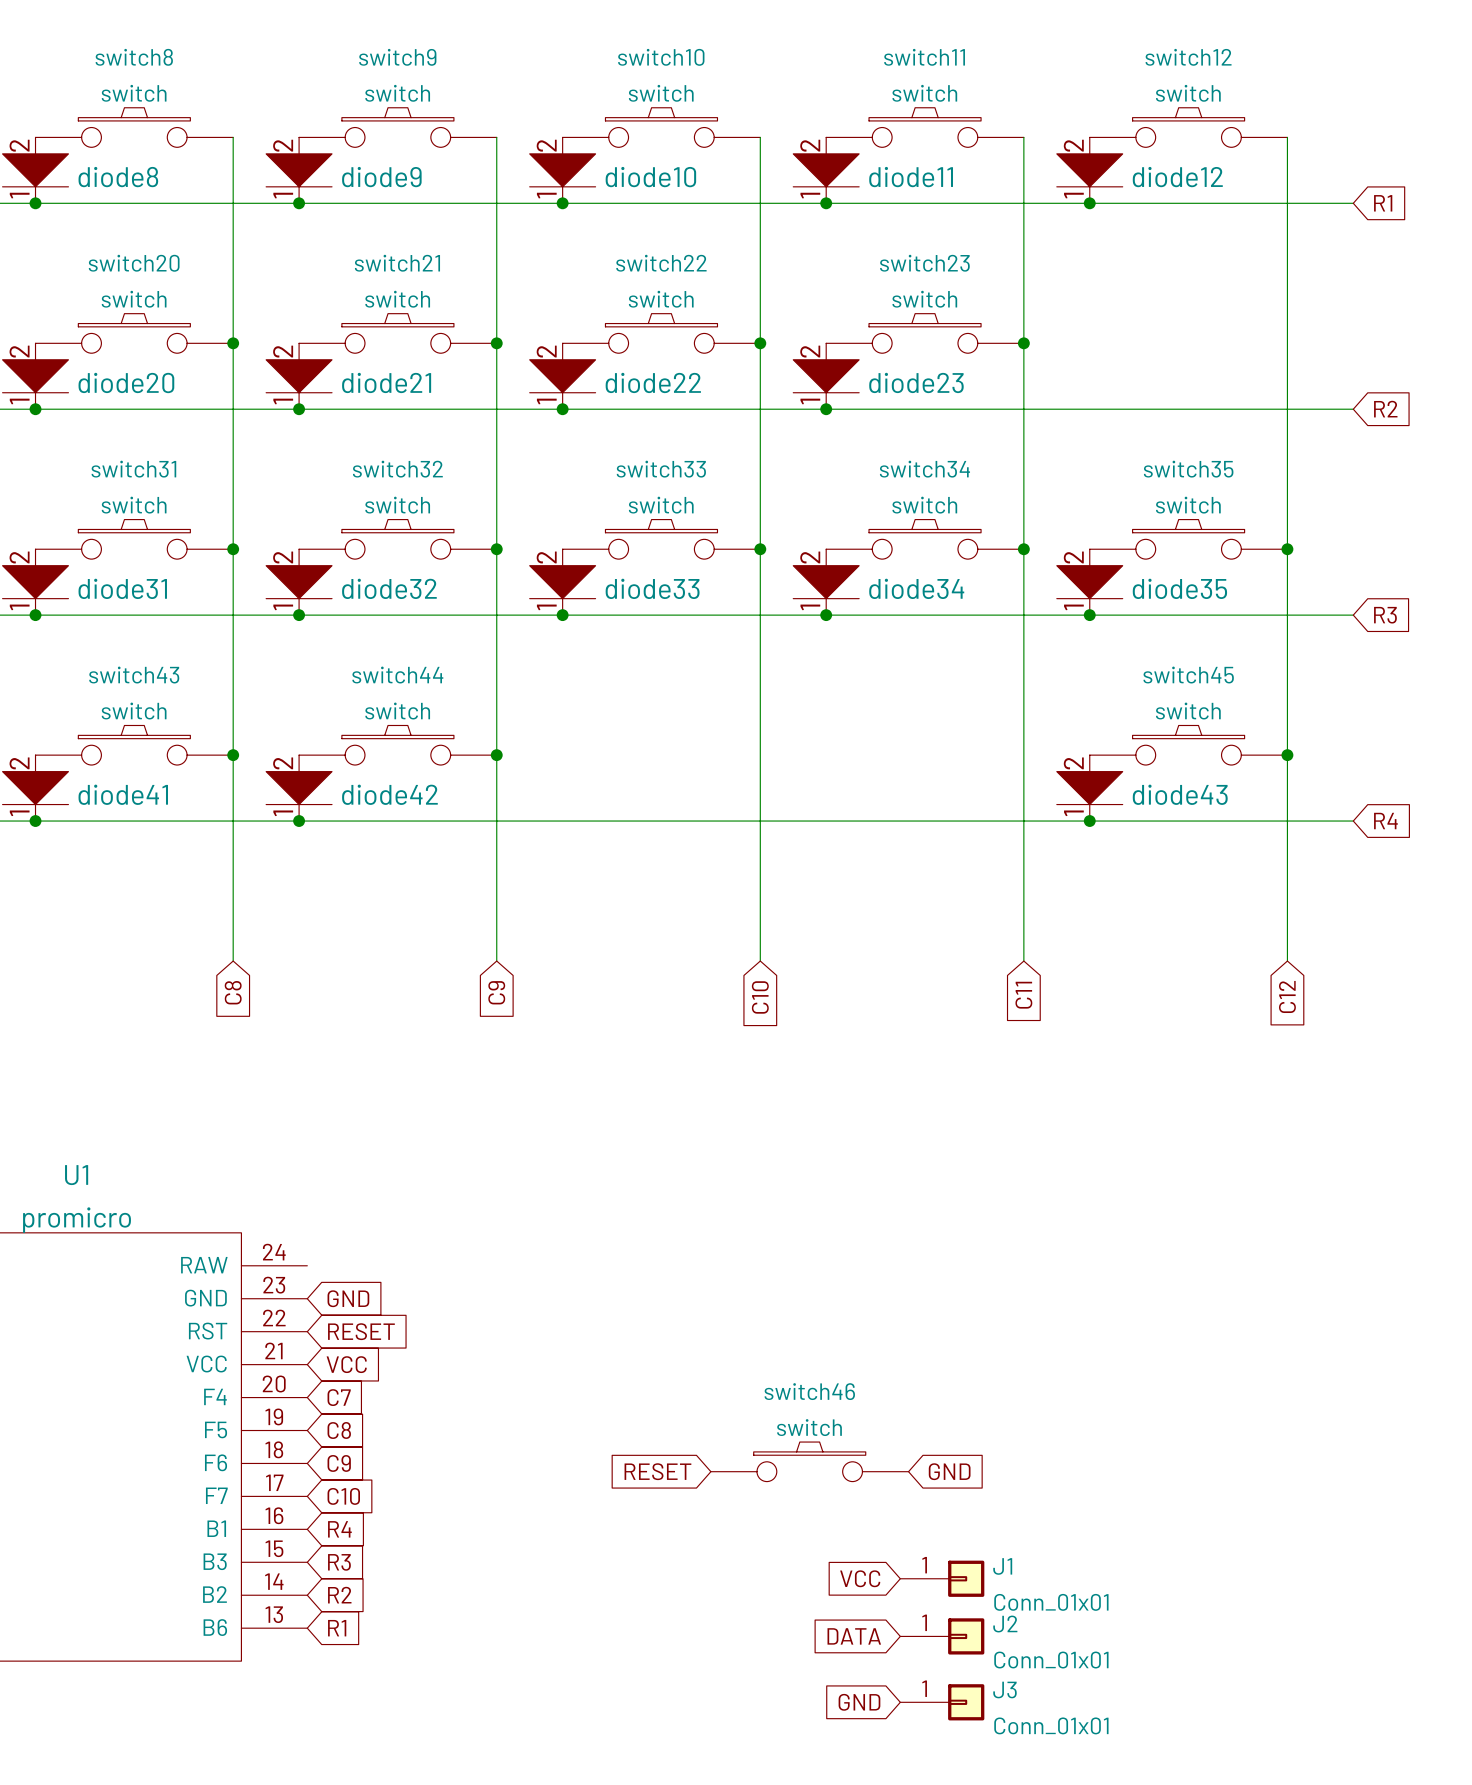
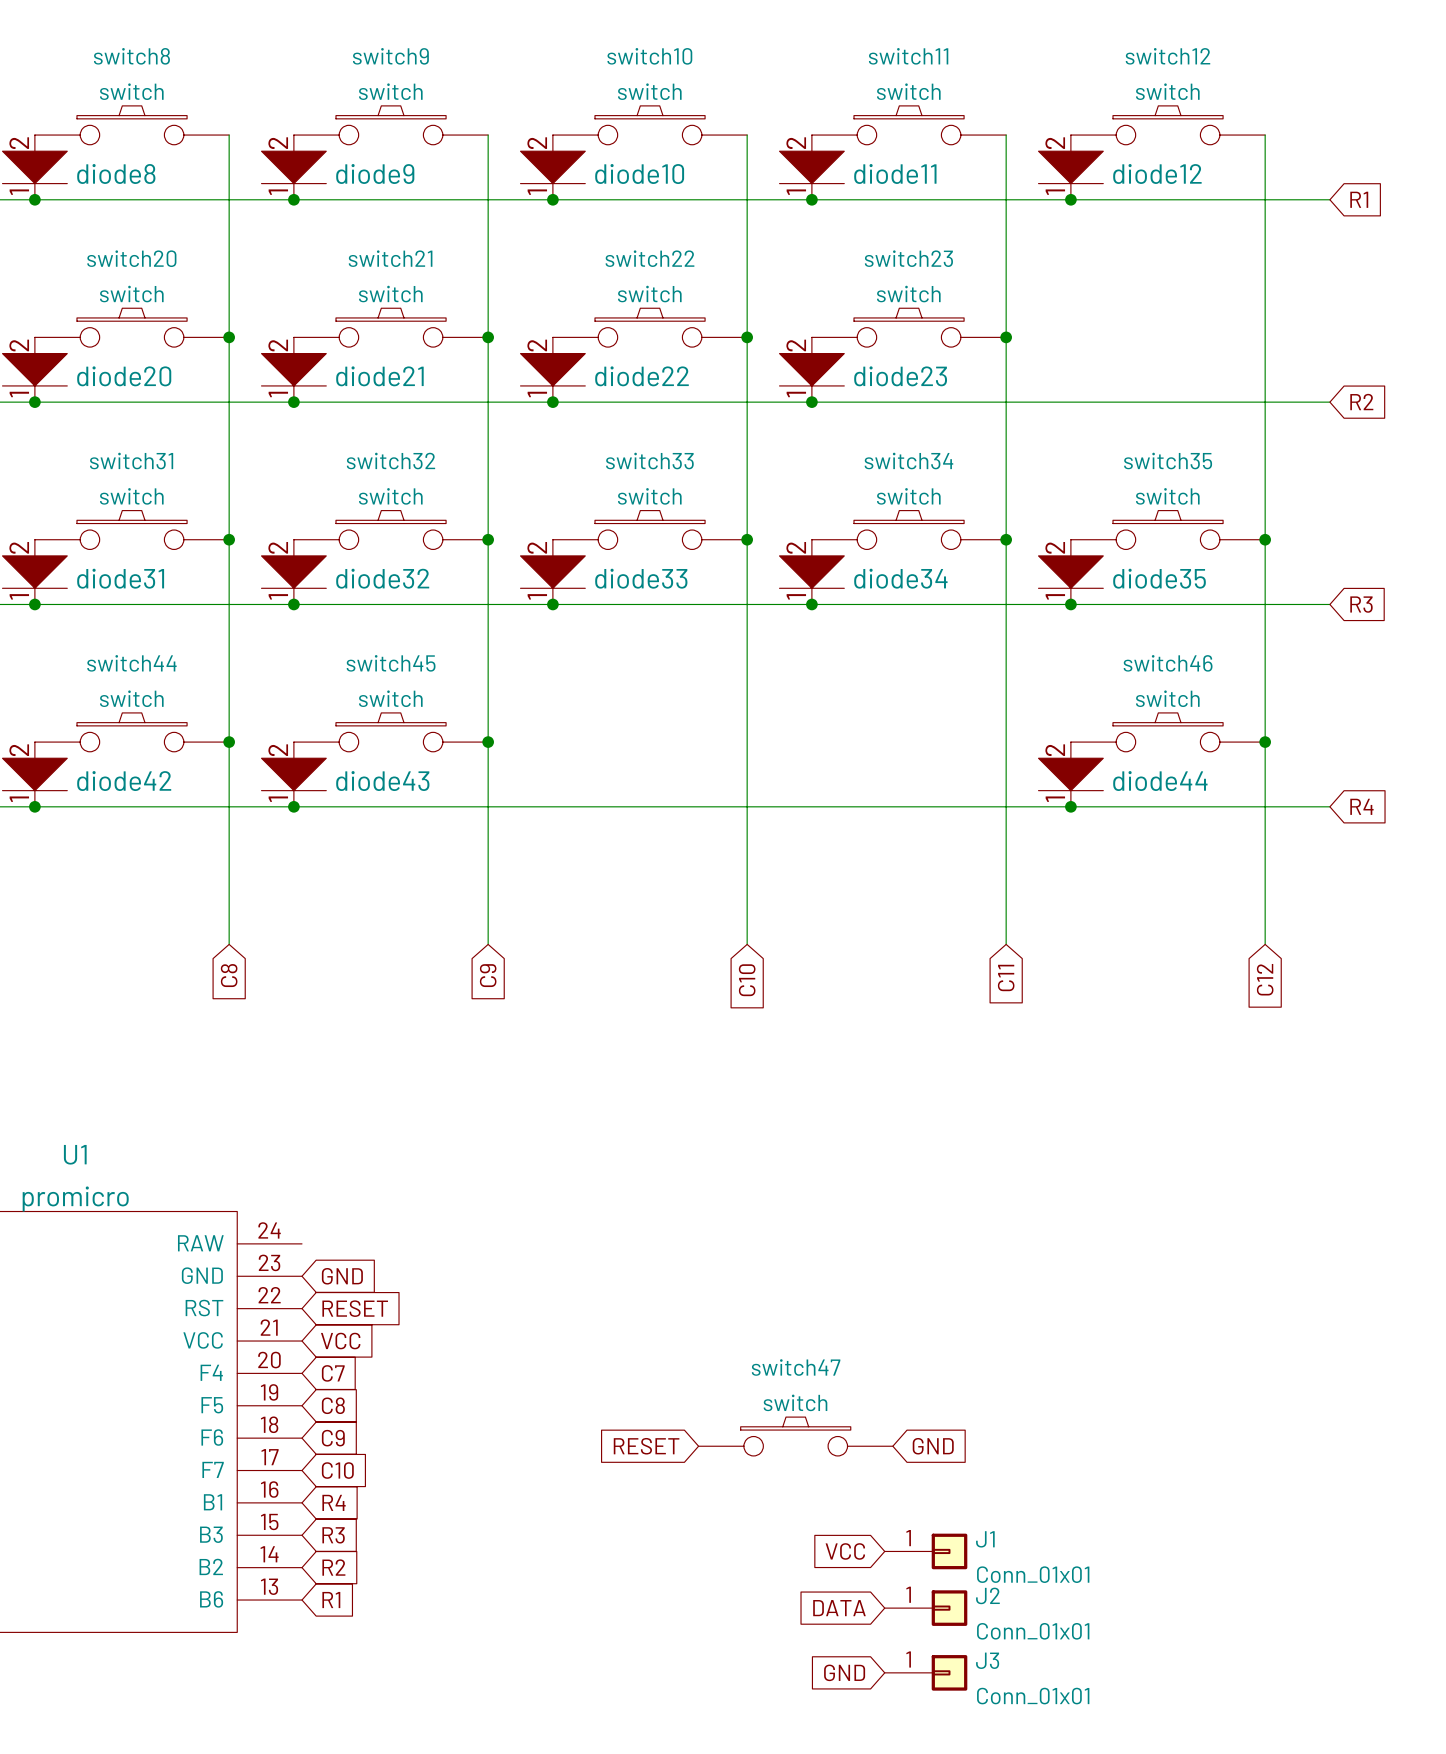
switch43 name: switch43 (134, 675) -> switch44 (131, 663)
switch44 name: switch44 (397, 675) -> switch45 (391, 663)
switch45 name: switch45 (1188, 675) -> switch46 (1168, 663)
diode41 name: diode41 (123, 794) -> diode42 (124, 781)
diode42 name: diode42 (389, 794) -> diode43 (382, 781)
diode43 name: diode43 (1180, 794) -> diode44 (1160, 781)
switch46 name: switch46 (809, 1391) -> switch47 (796, 1367)

